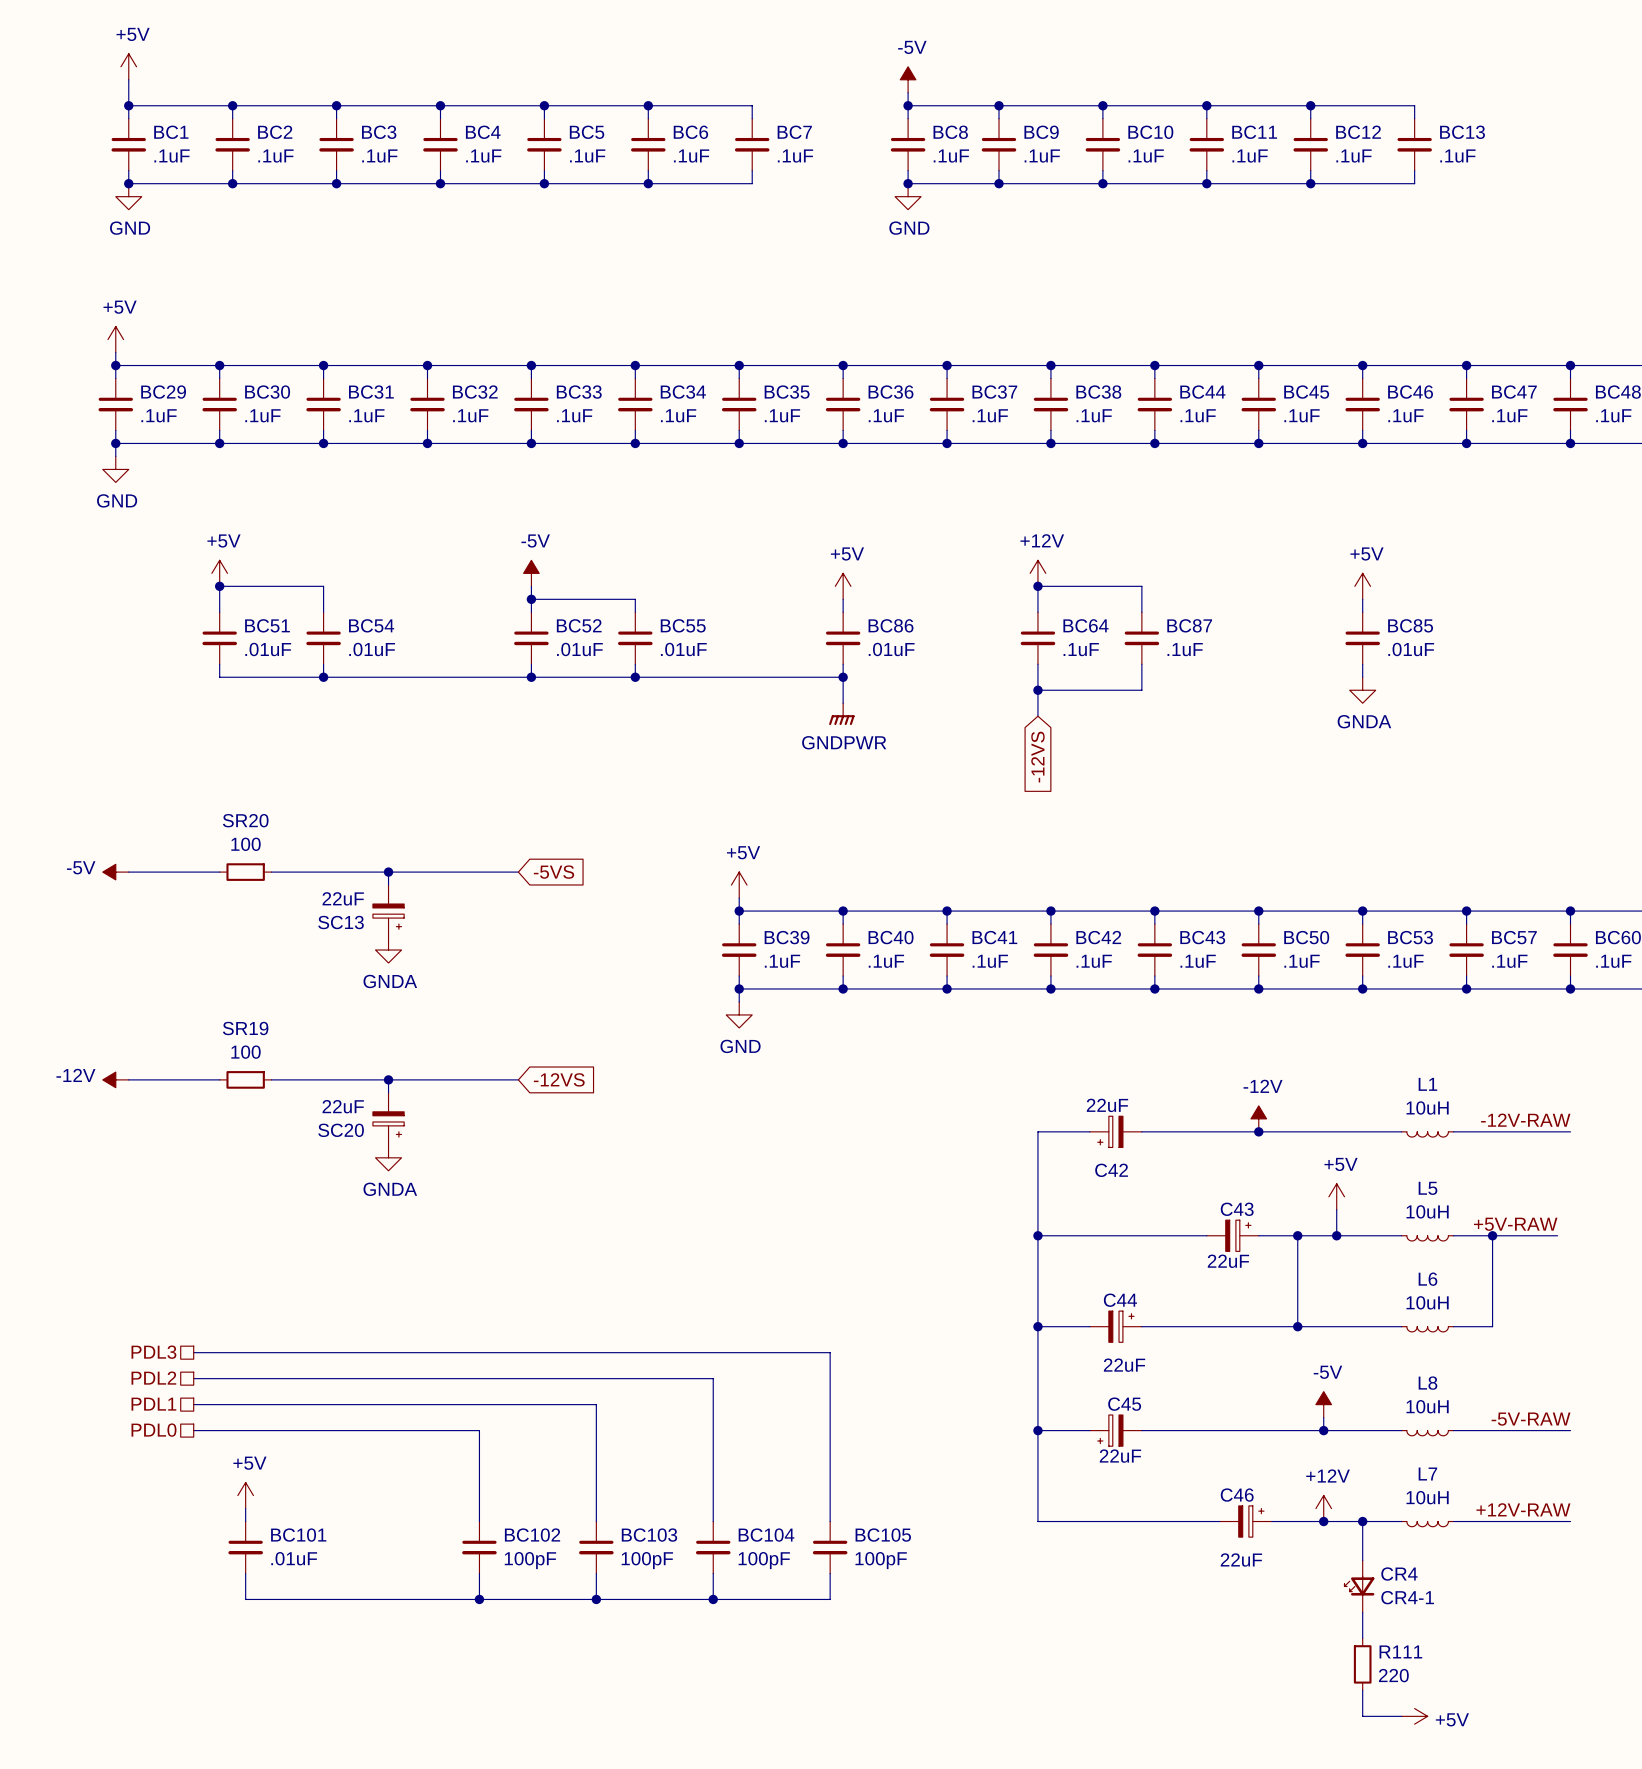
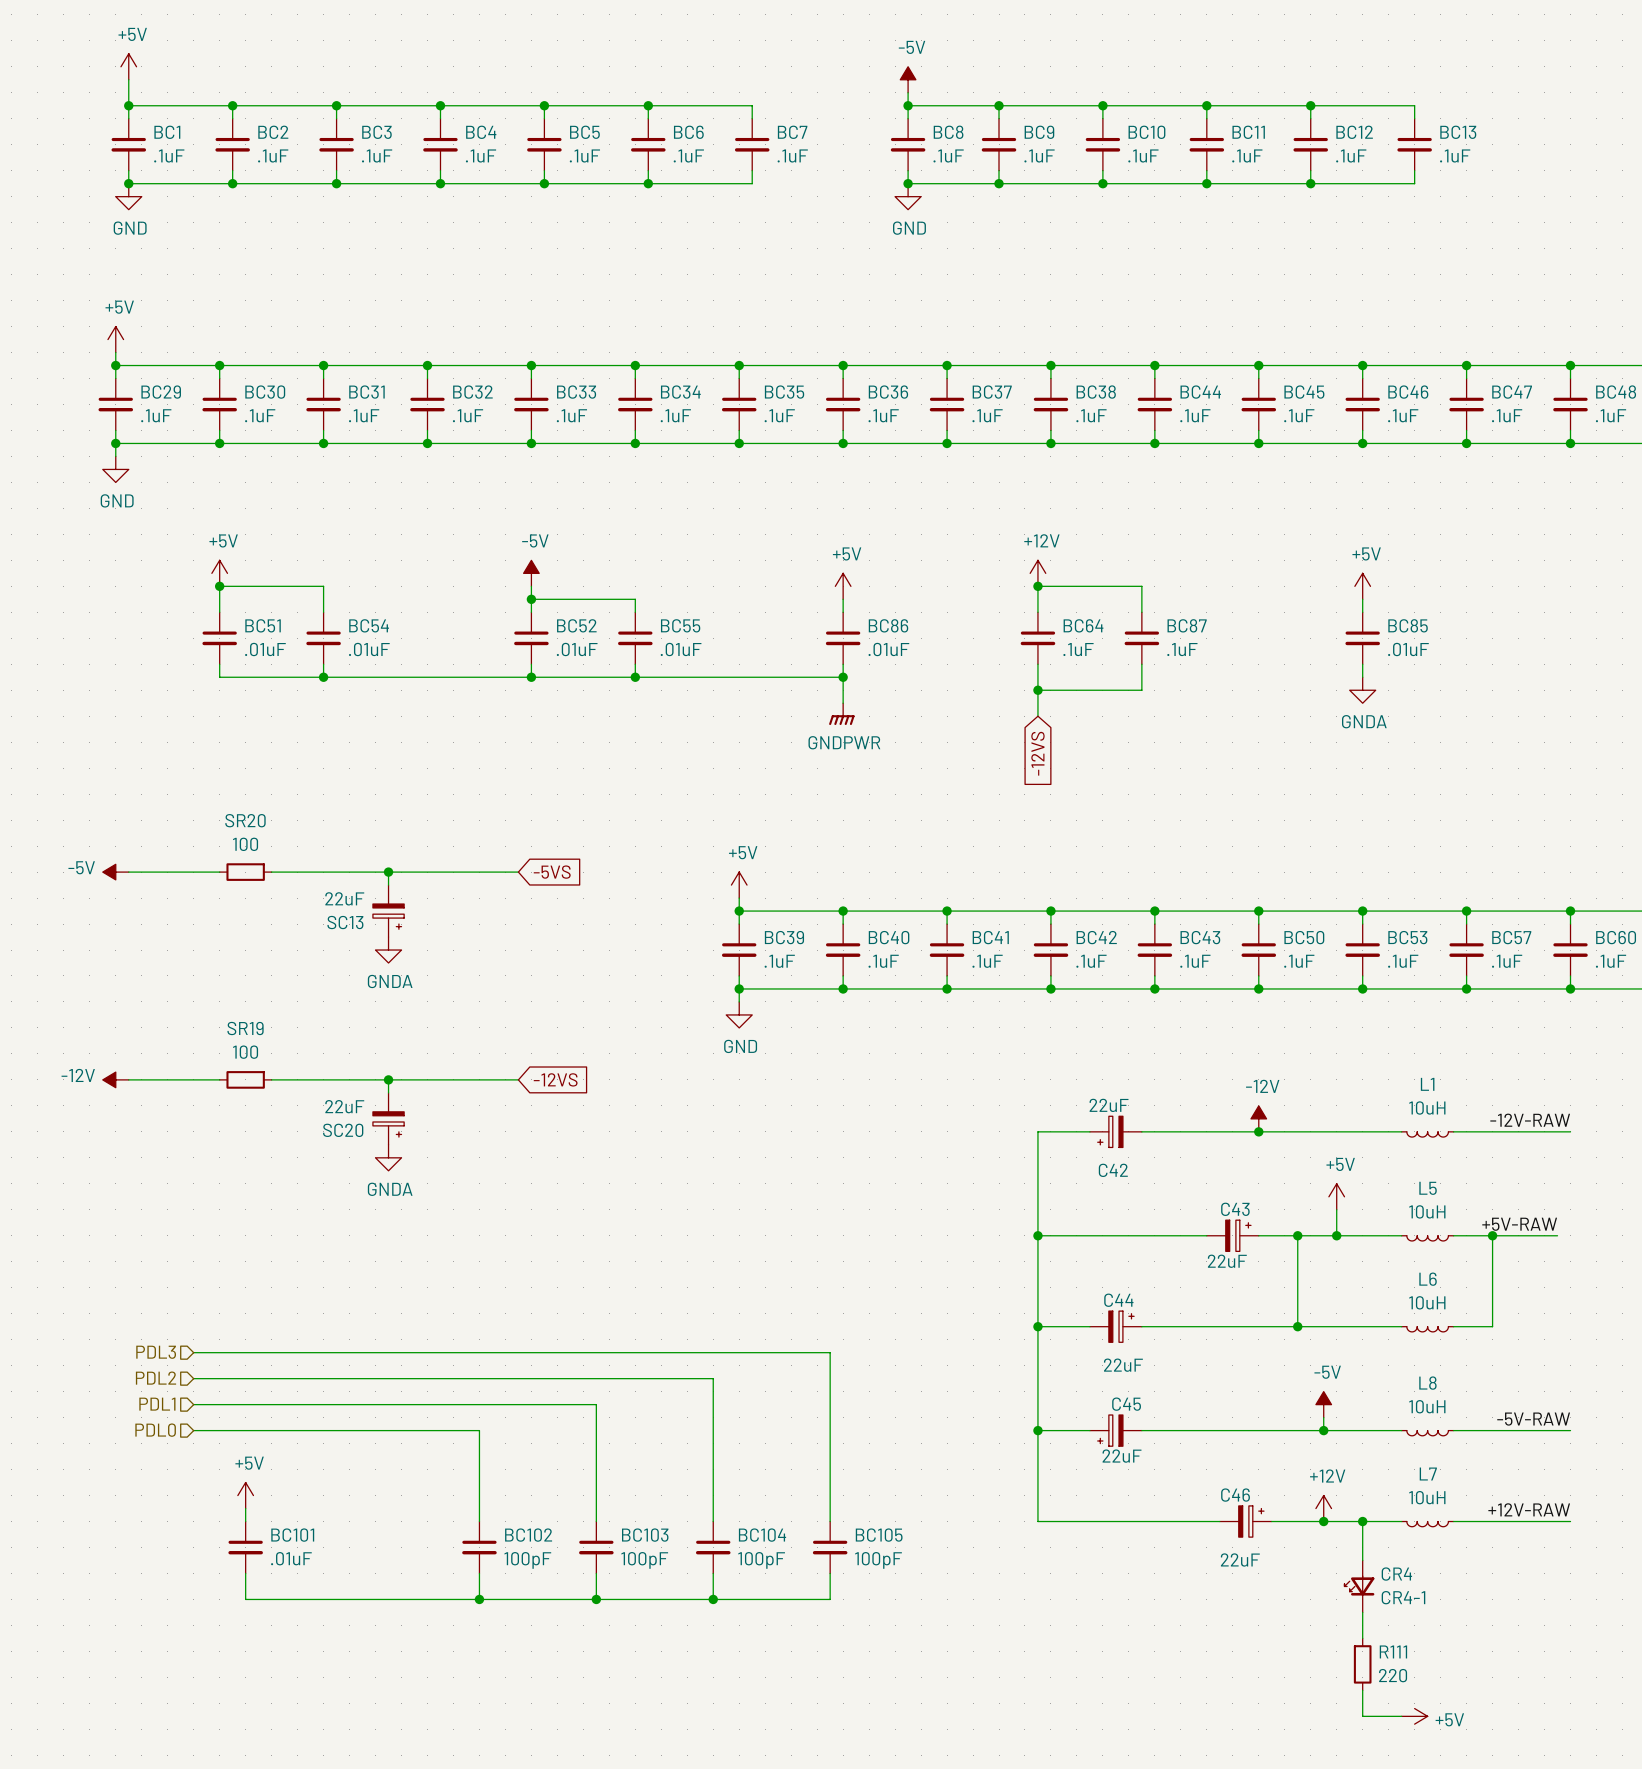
hierarchical label shape: passive (153, 1352) -> input (156, 1352)
hierarchical label shape: passive (153, 1378) -> input (156, 1378)
hierarchical label shape: passive (153, 1404) -> input (157, 1404)
hierarchical label shape: passive (153, 1430) -> input (155, 1430)

